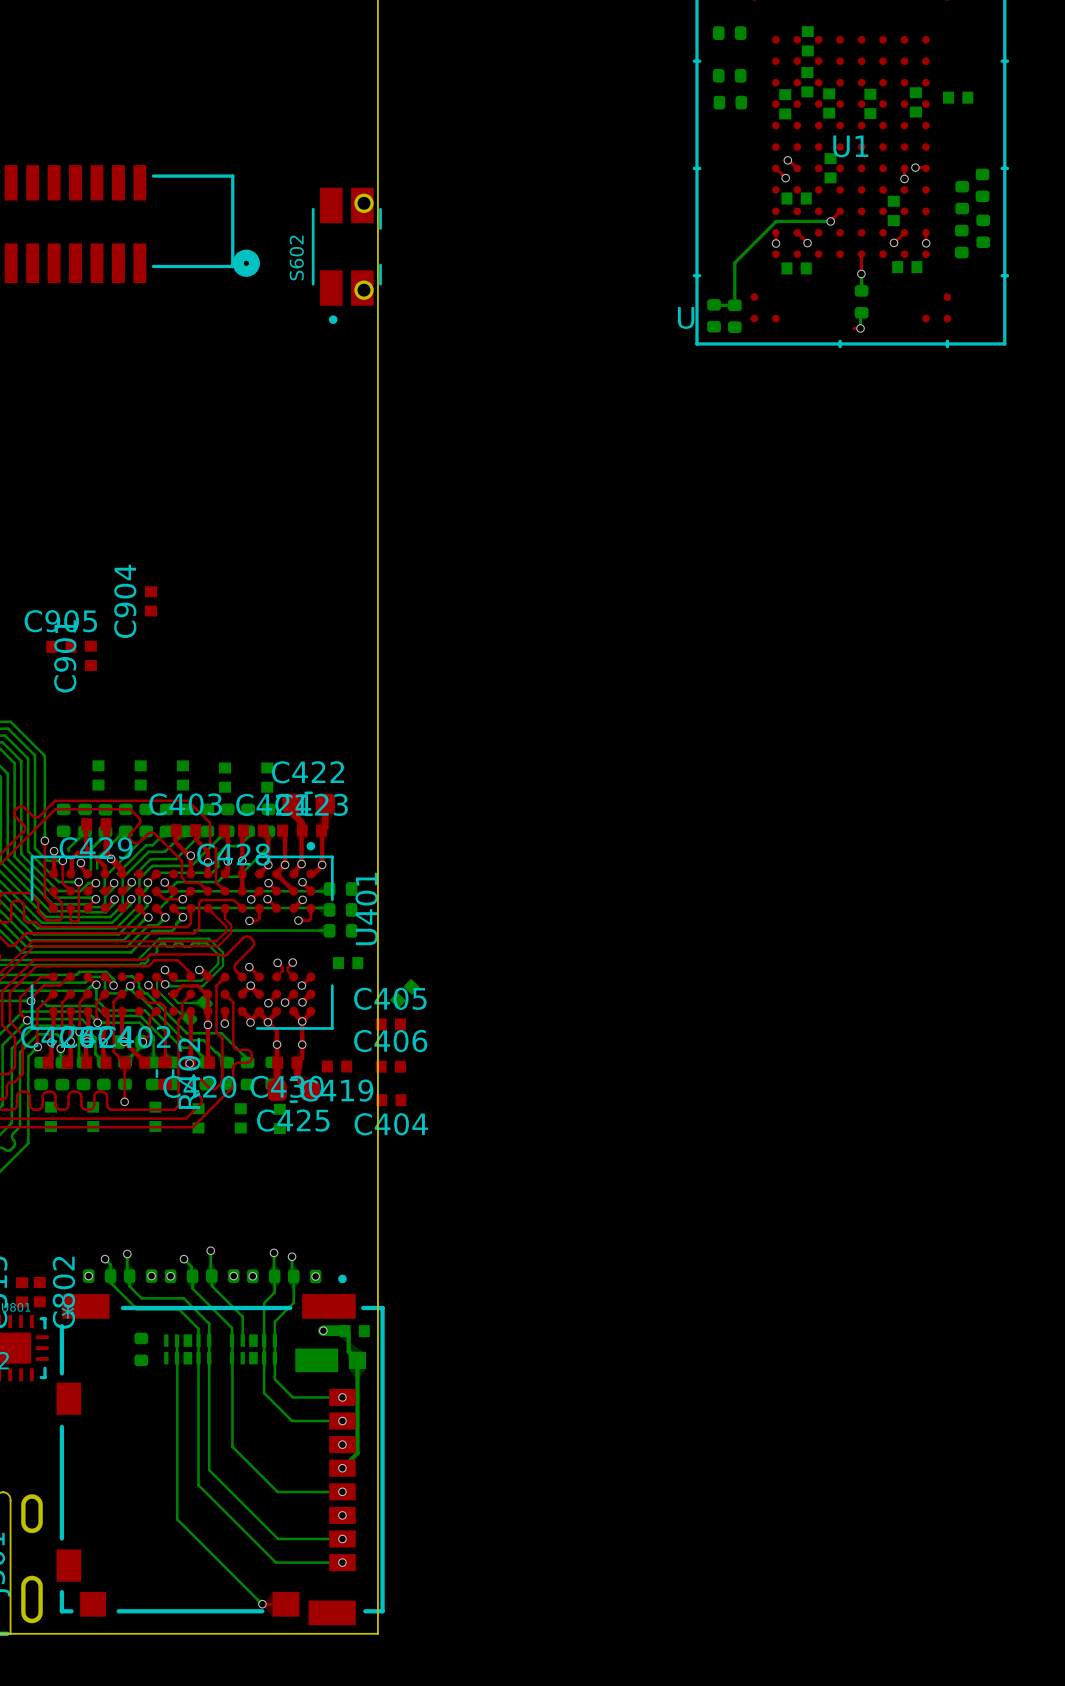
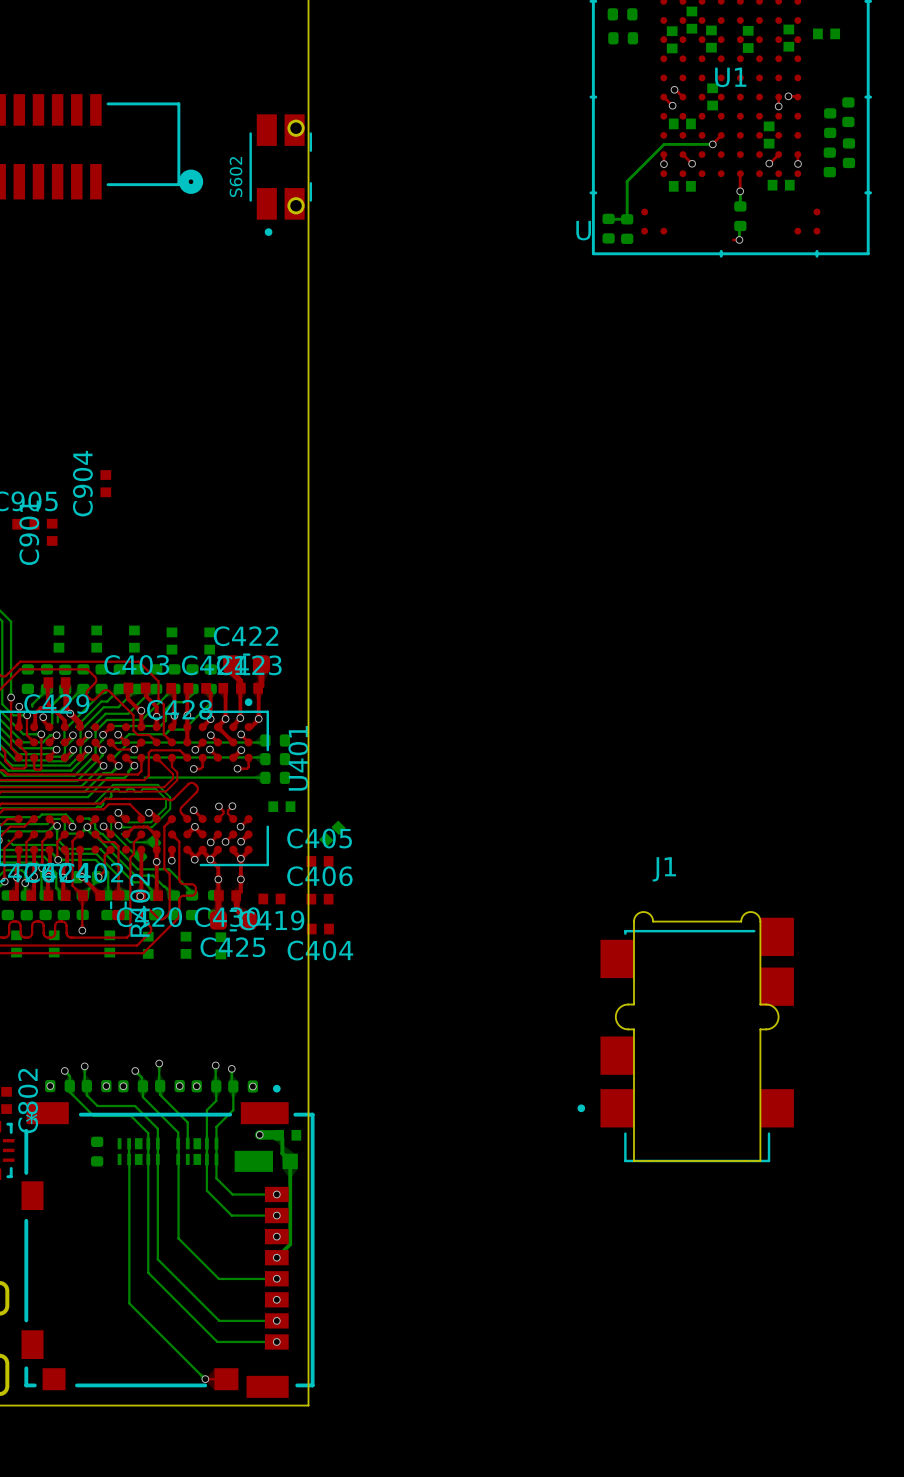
J1: none -> (685, 1037)

